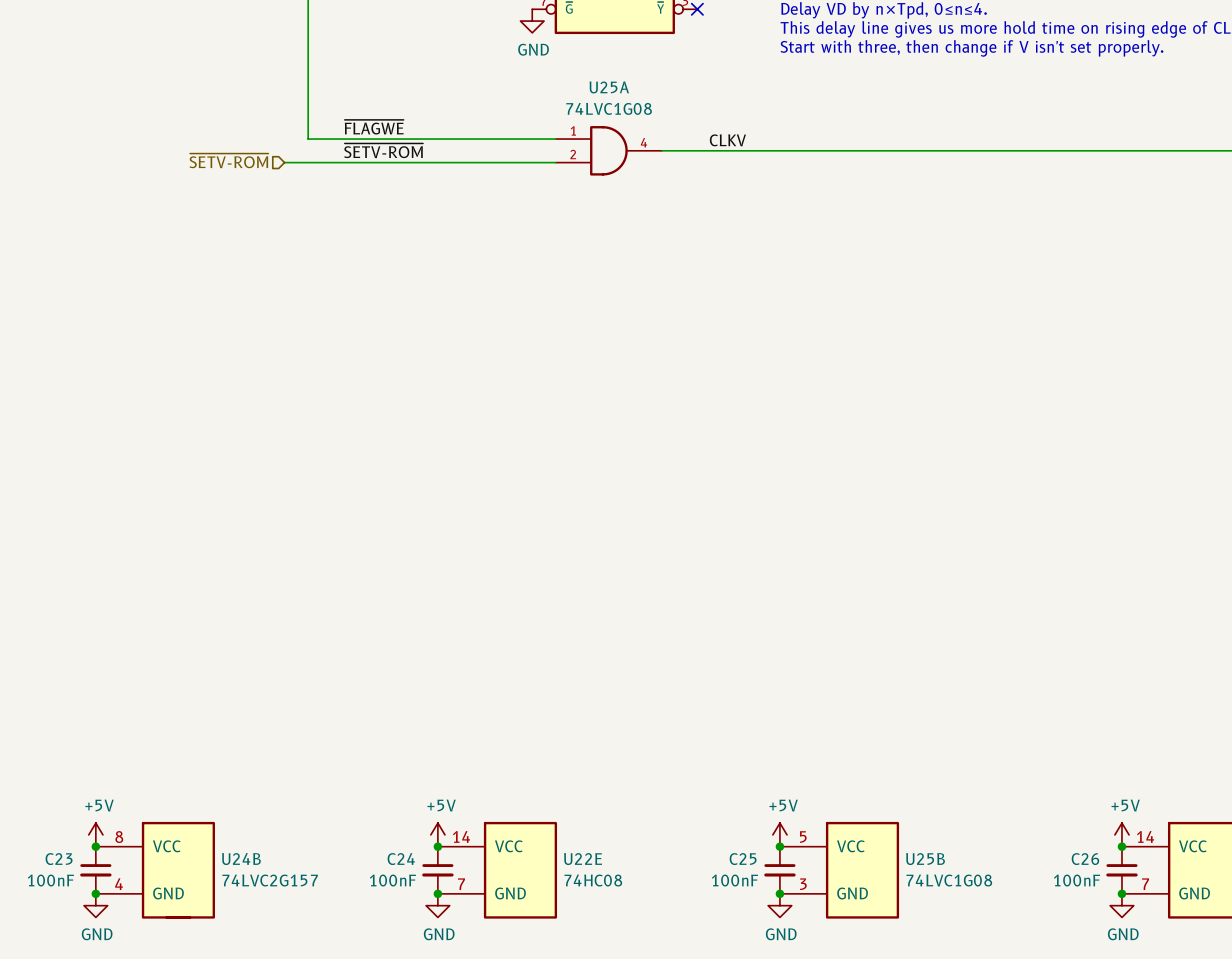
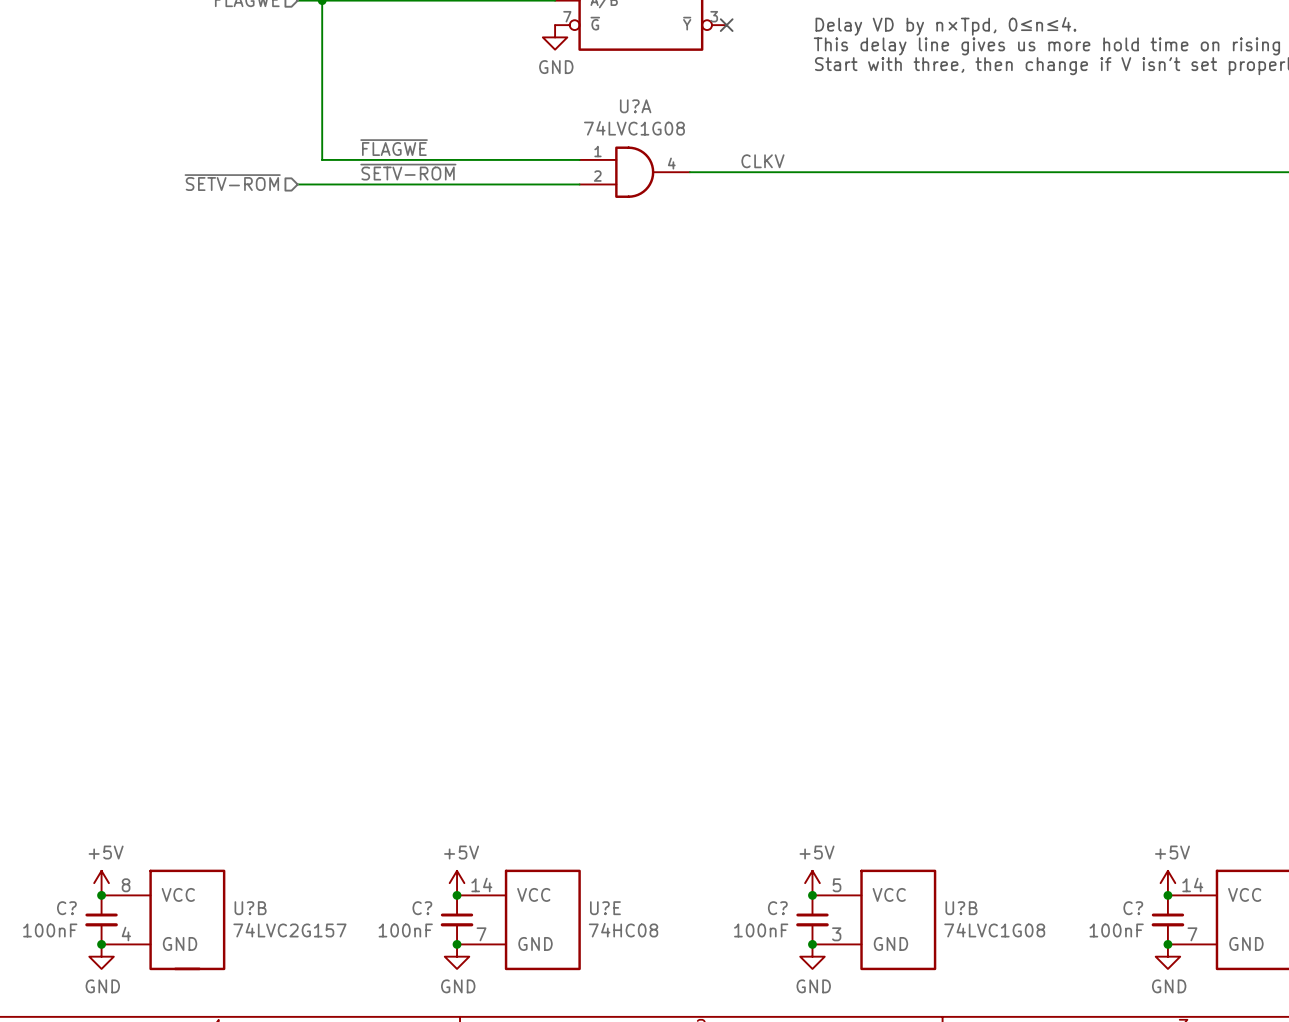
U25A name: U25A (609, 87) -> U?A (635, 106)
C23 name: C23 (59, 859) -> C? (66, 908)
U24B name: U24B (241, 859) -> U?B (250, 908)
C24 name: C24 (401, 859) -> C? (422, 908)
U22E name: U22E (583, 859) -> U?E (605, 908)
C25 name: C25 (743, 859) -> C? (777, 908)
U25B name: U25B (925, 859) -> U?B (961, 908)
C26 name: C26 (1085, 859) -> C? (1133, 908)

